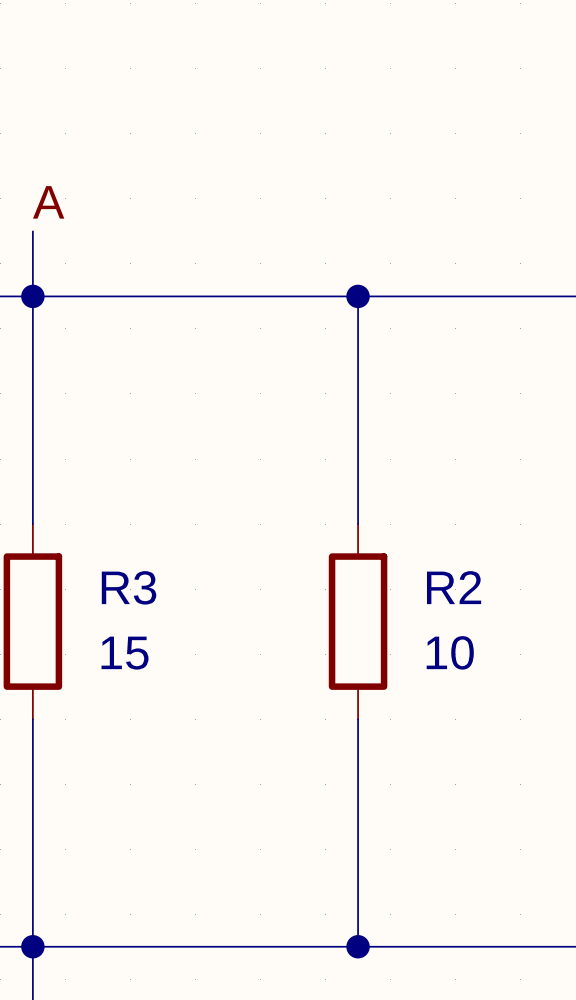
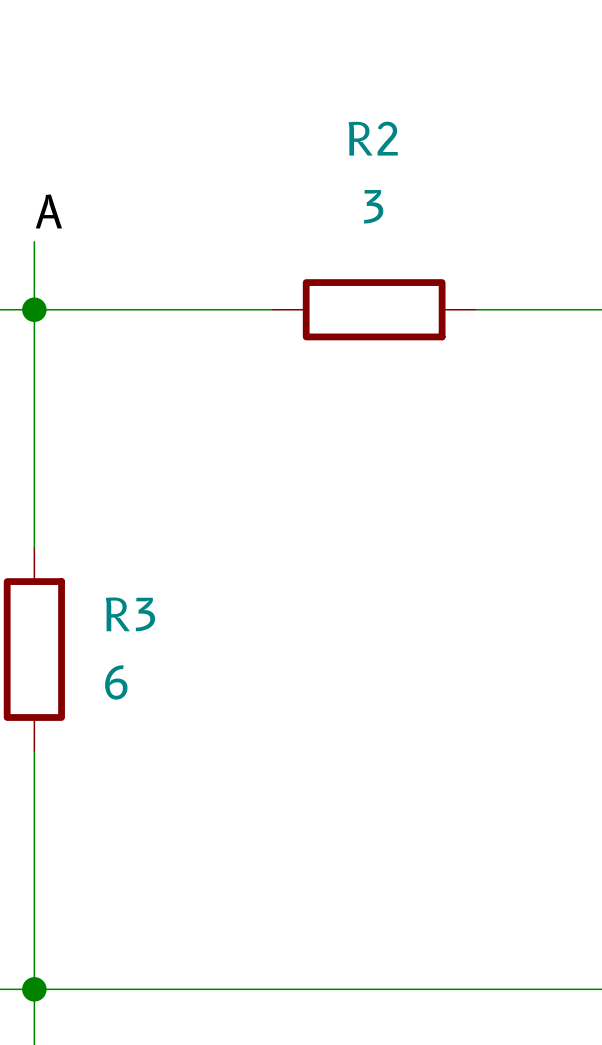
wire: (260, 296) (455, 296) -> none
wire: (358, 296) (358, 524) -> none
junction: (358, 296) -> none
R2 name position: R2 (454, 587) -> R2 (373, 138)
R2 rotation: 0° (358, 621) -> 90° clockwise (374, 309)
R2 position: (358, 621) -> (374, 309)
R2 value: 10 (450, 652) -> 3 (373, 206)
R3 value: 15 (125, 653) -> 6 (116, 682)
wire: (358, 719) (358, 946) -> none
junction: (358, 946) -> none

